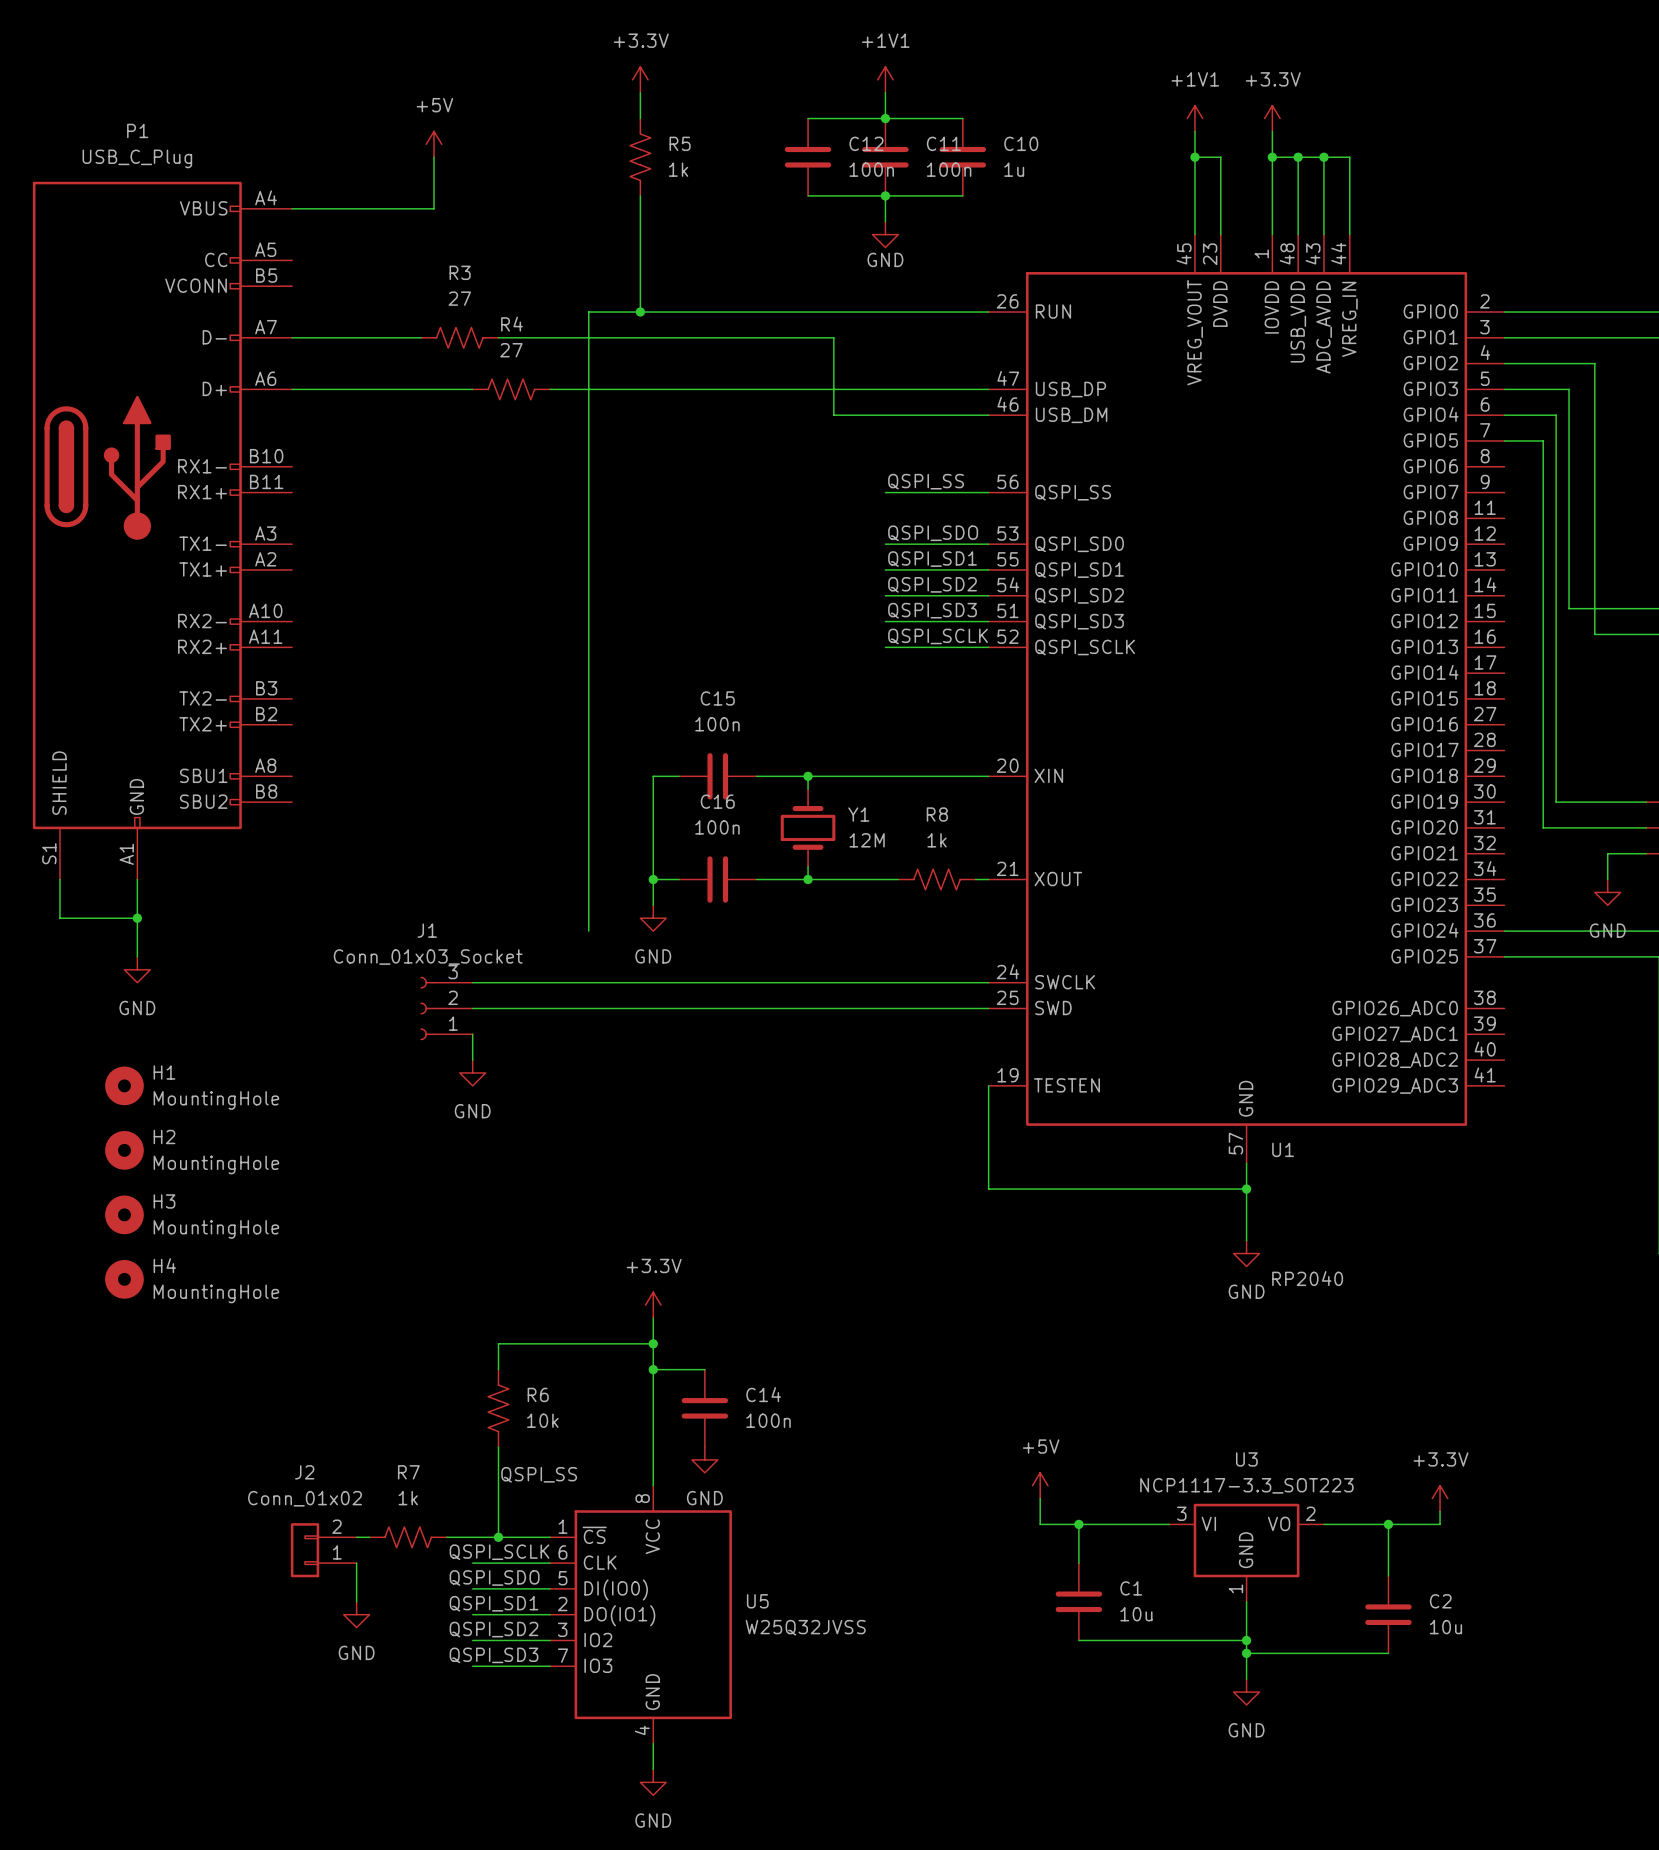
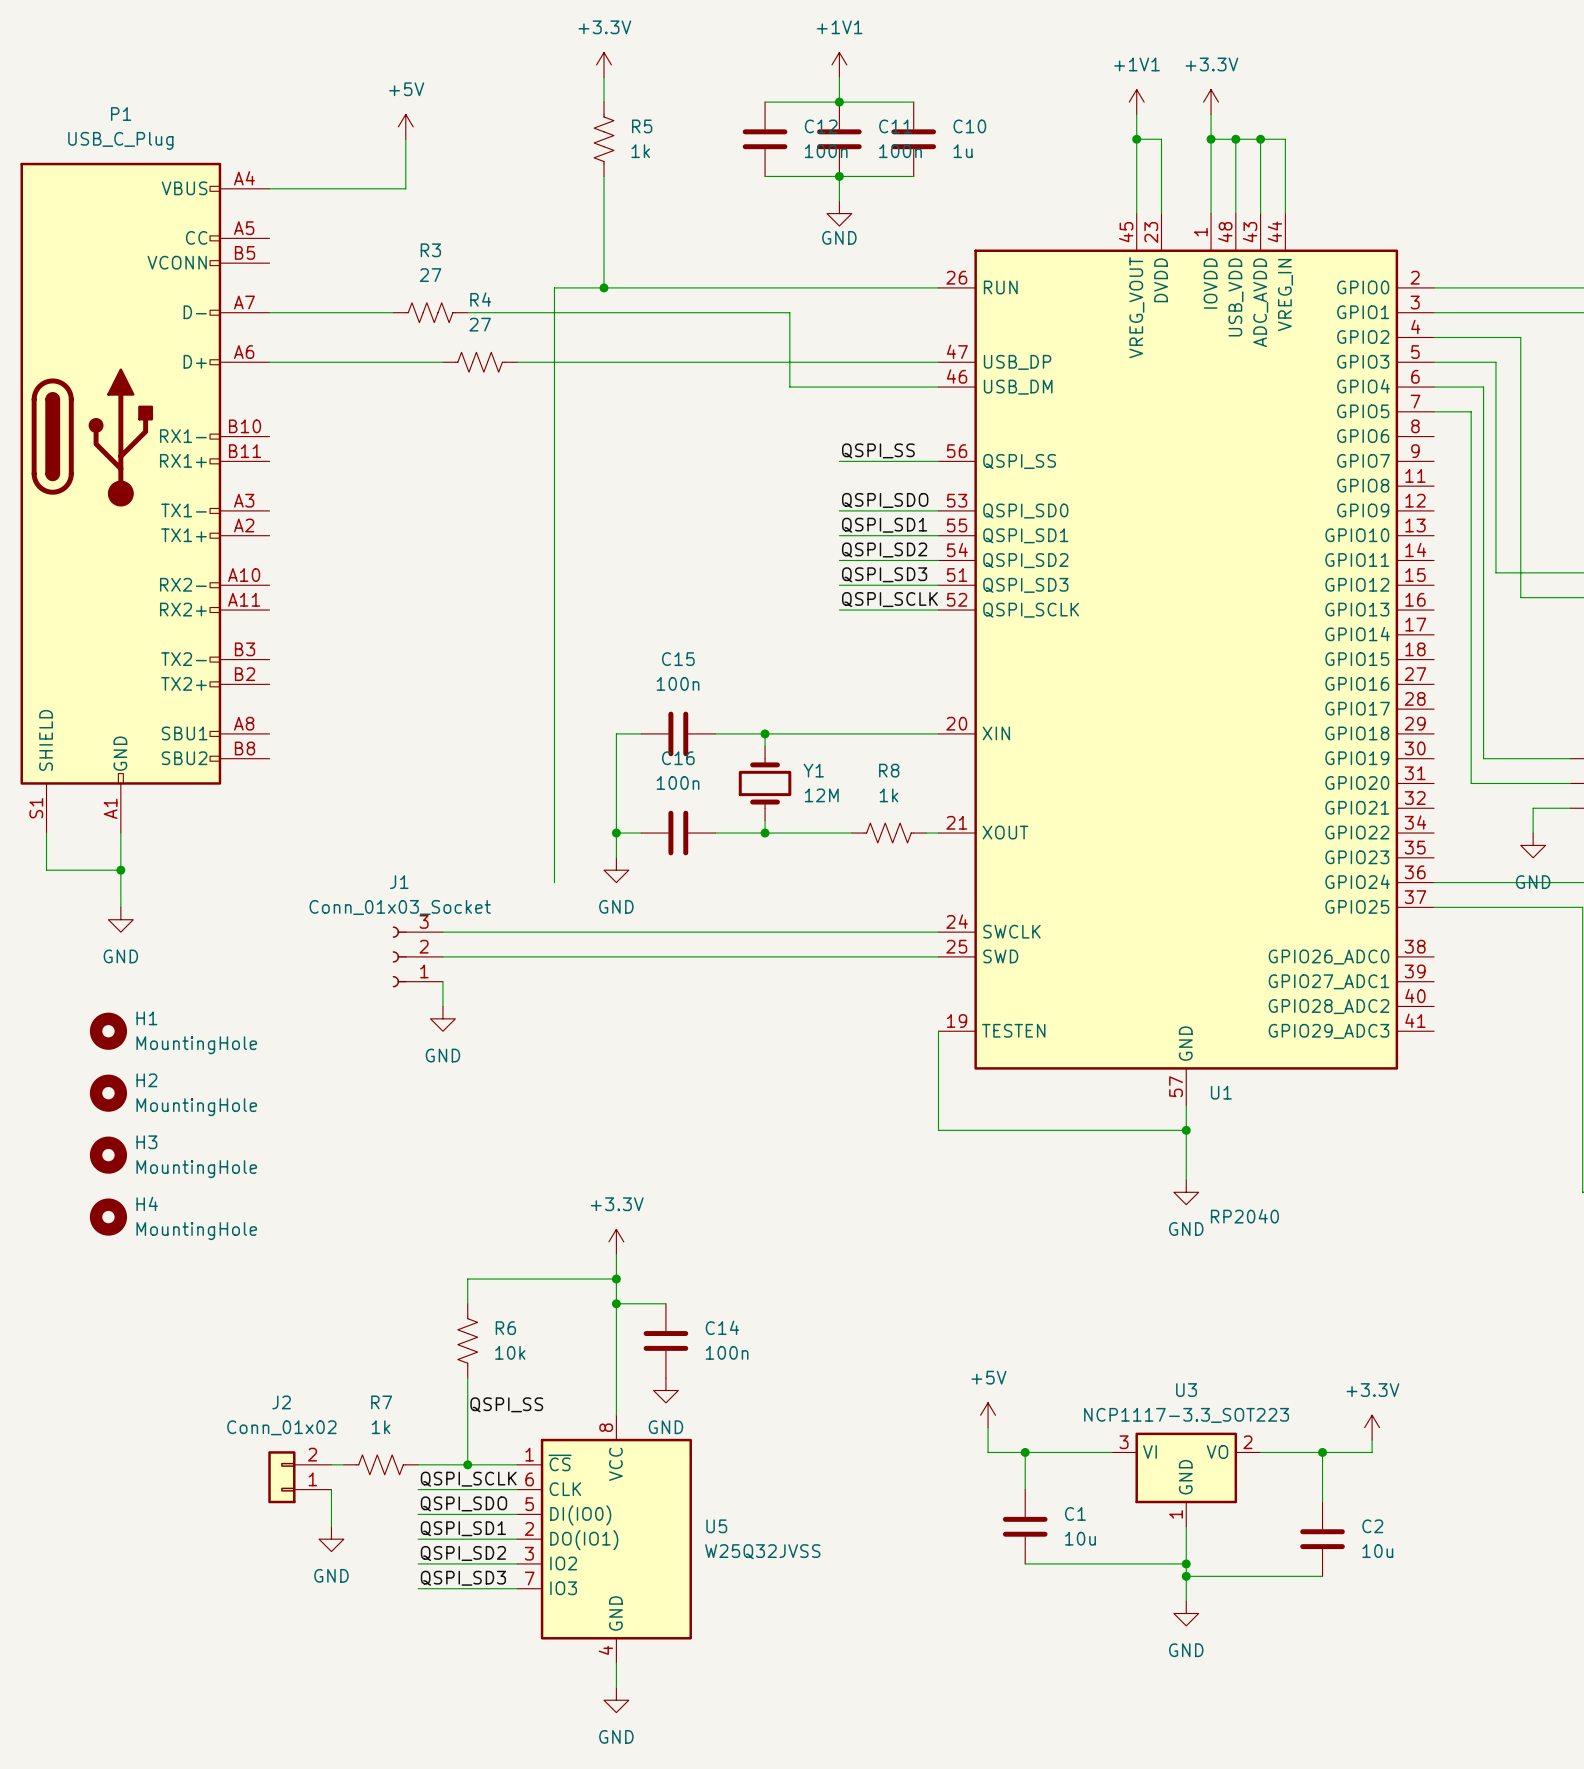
wire: none -> (418, 1489) (442, 1489)
wire: none -> (418, 1514) (442, 1514)
wire: none -> (418, 1539) (442, 1539)
wire: none -> (418, 1563) (442, 1563)
wire: none -> (418, 1588) (442, 1588)

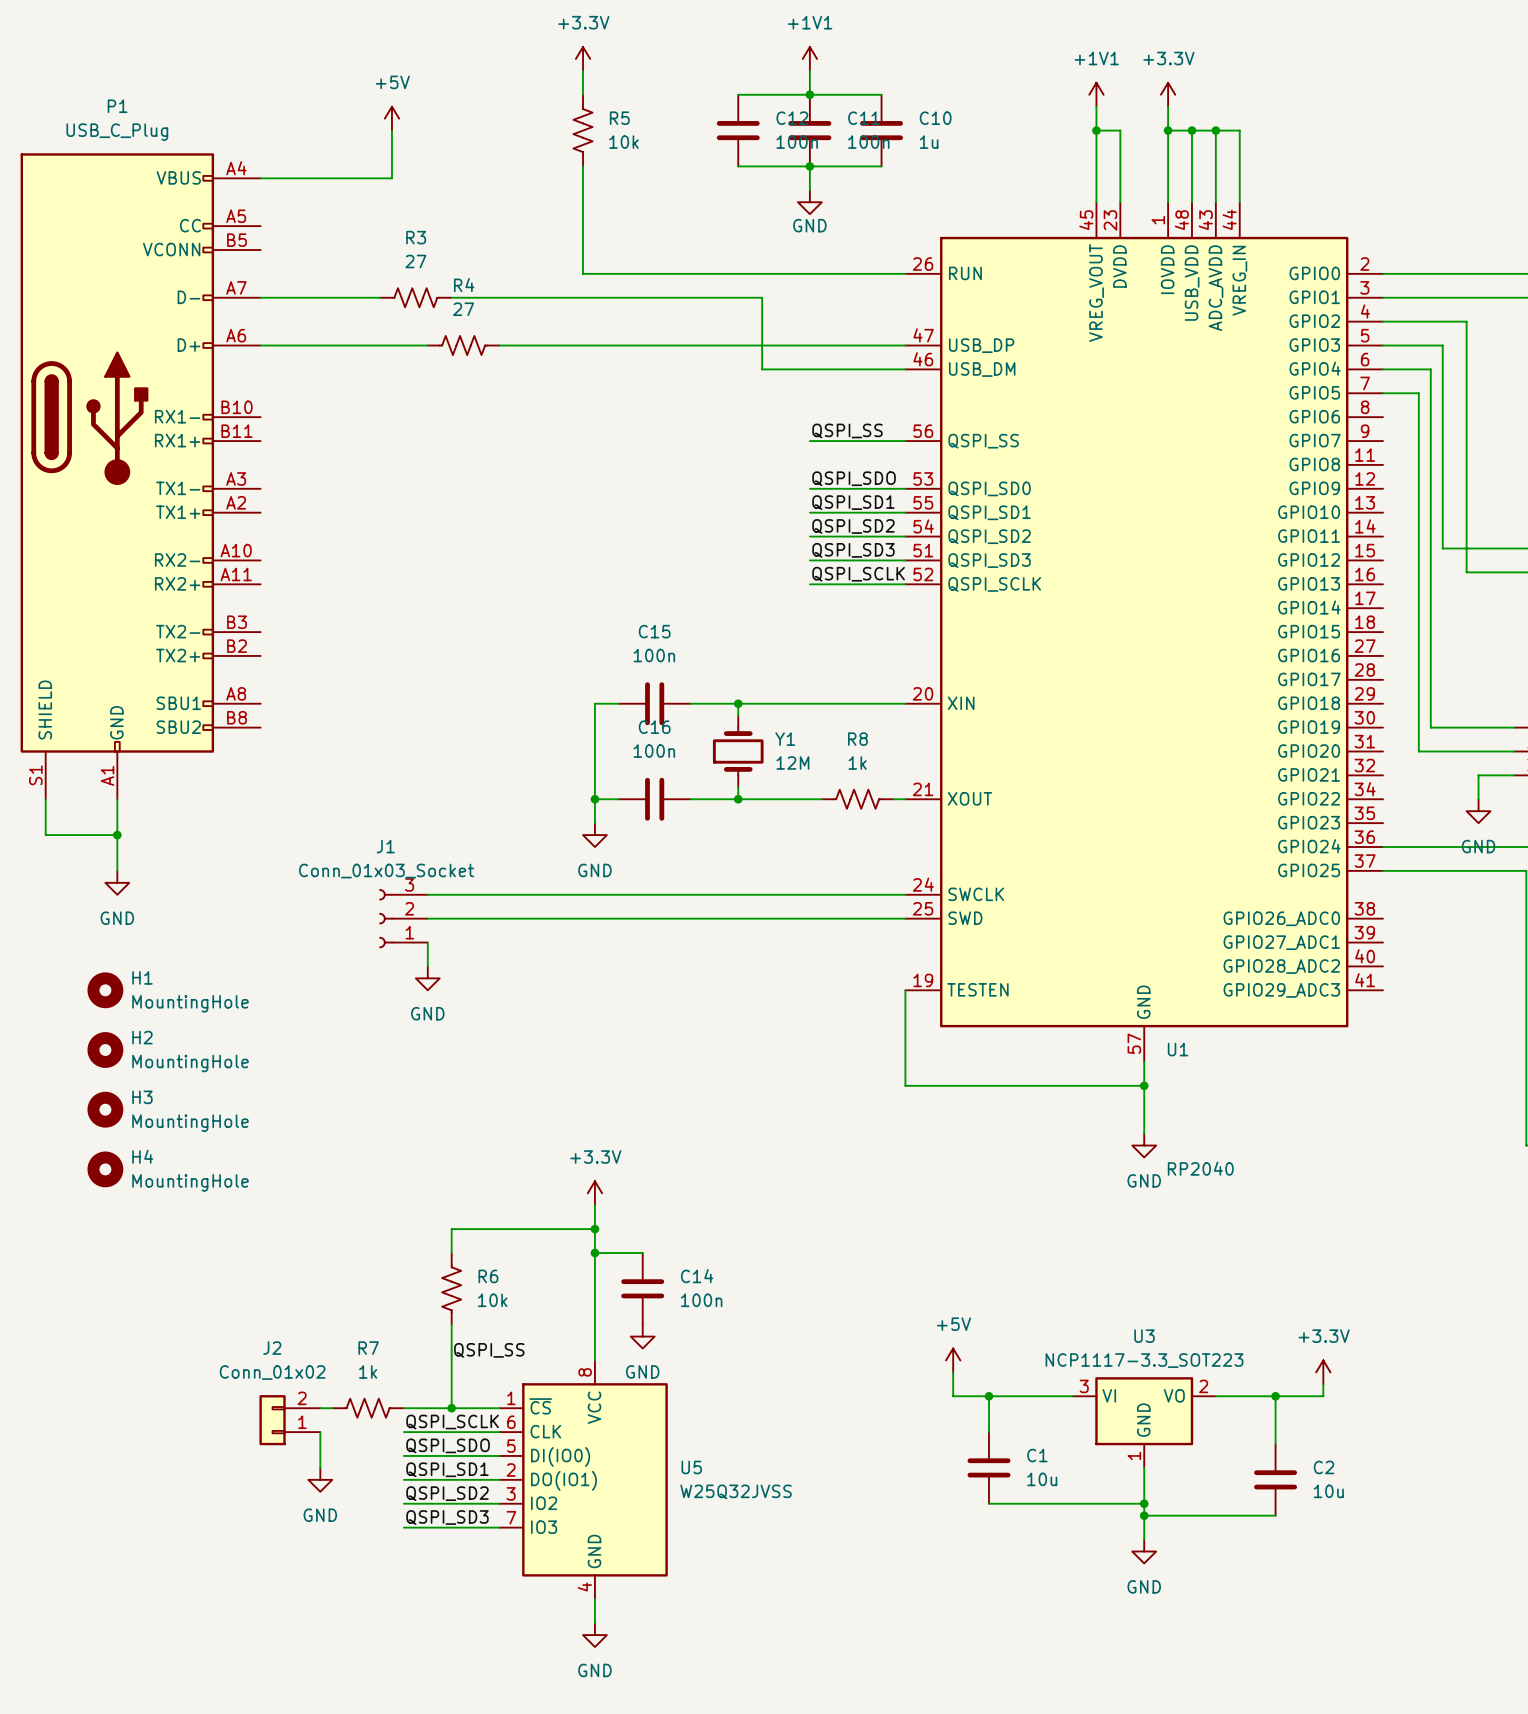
R5 value: 1k (640, 151) -> 10k (624, 142)
wire: (604, 287) (554, 287) (554, 882) -> none
junction: (604, 287) -> none

